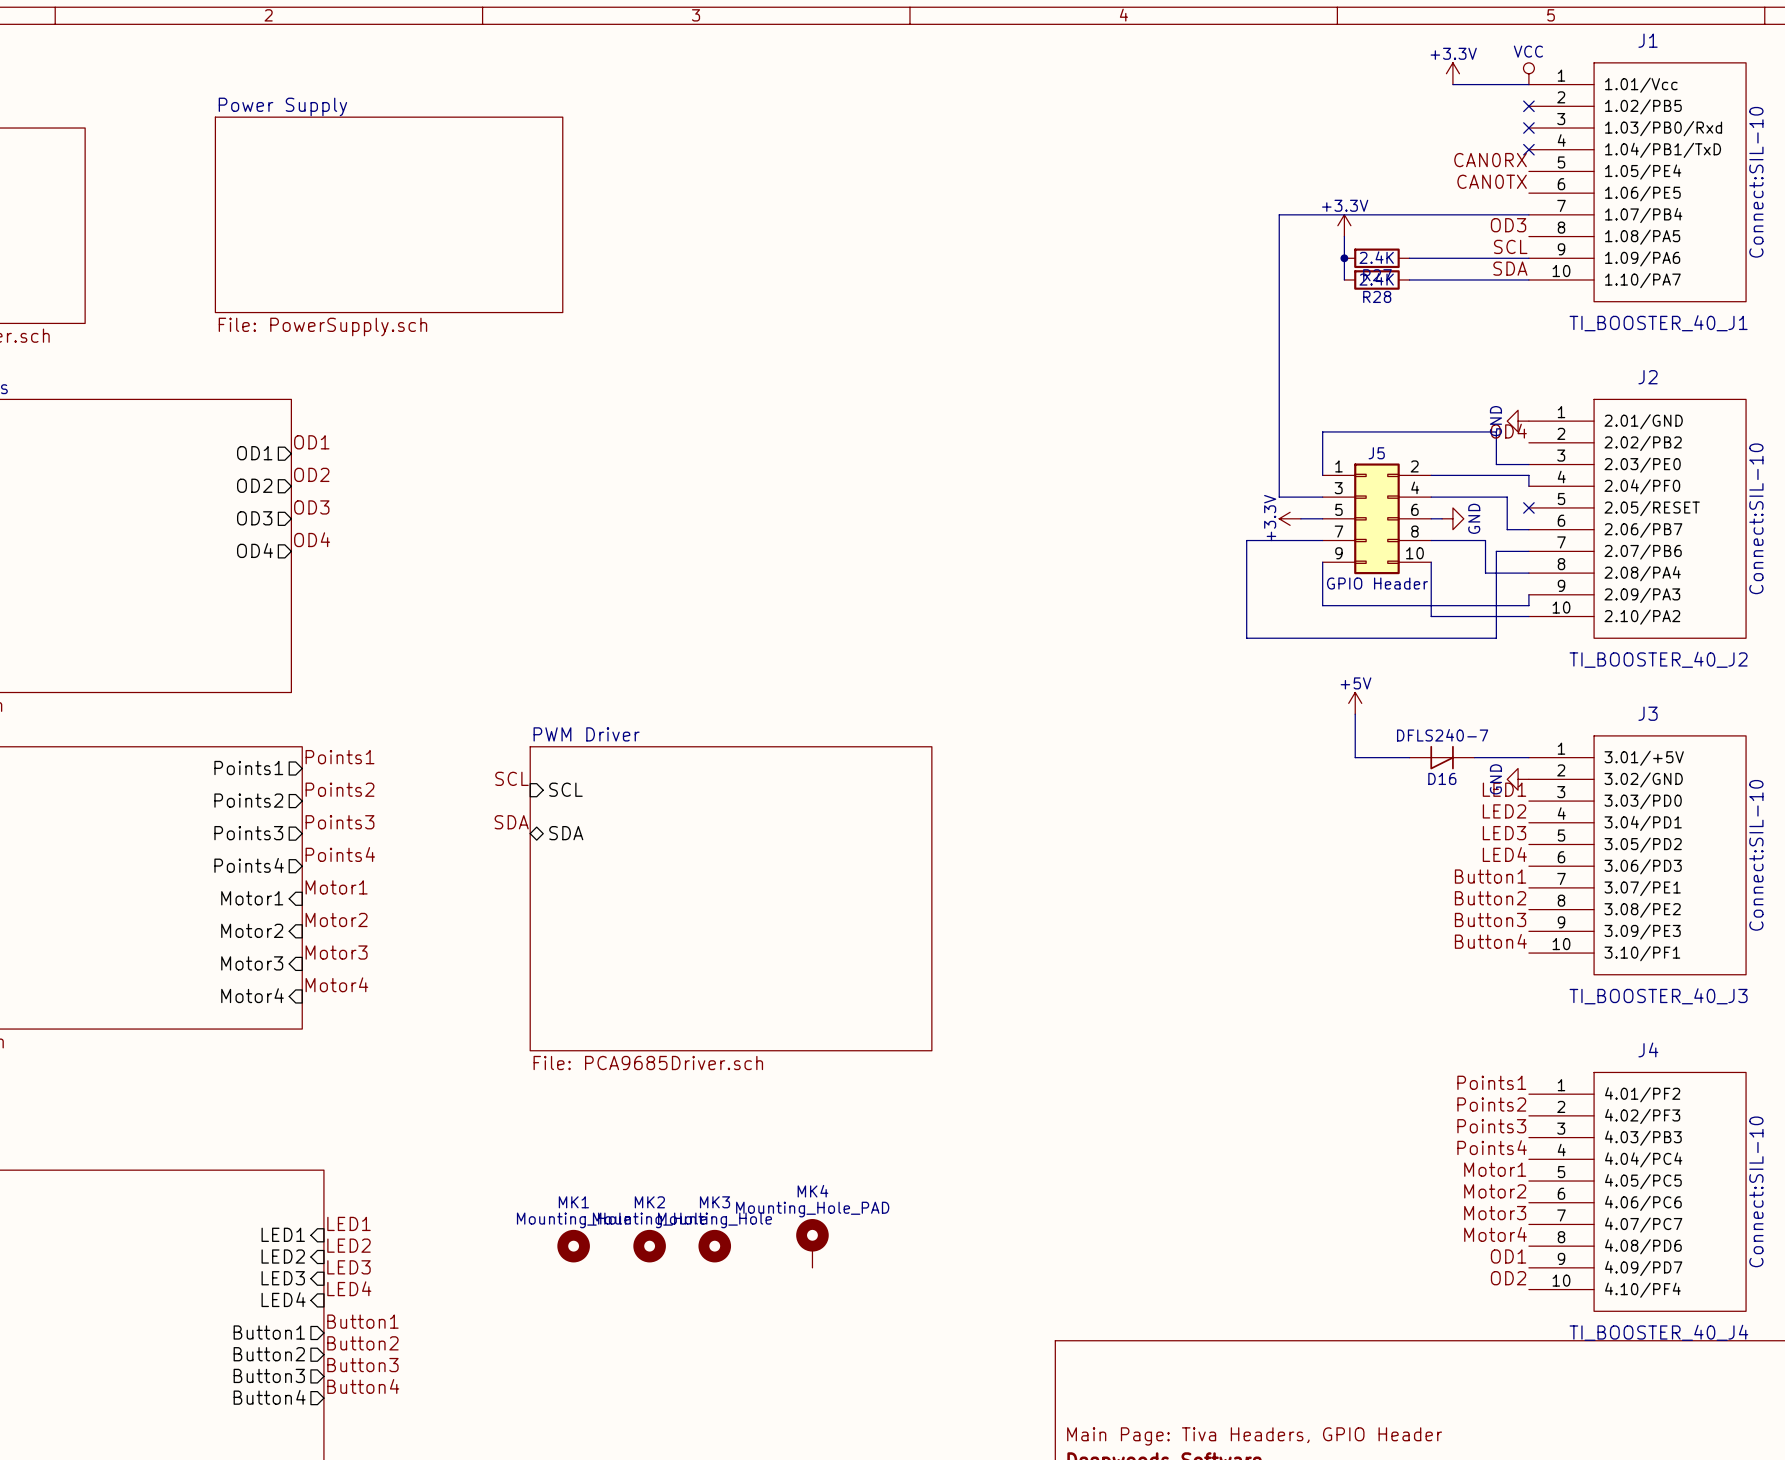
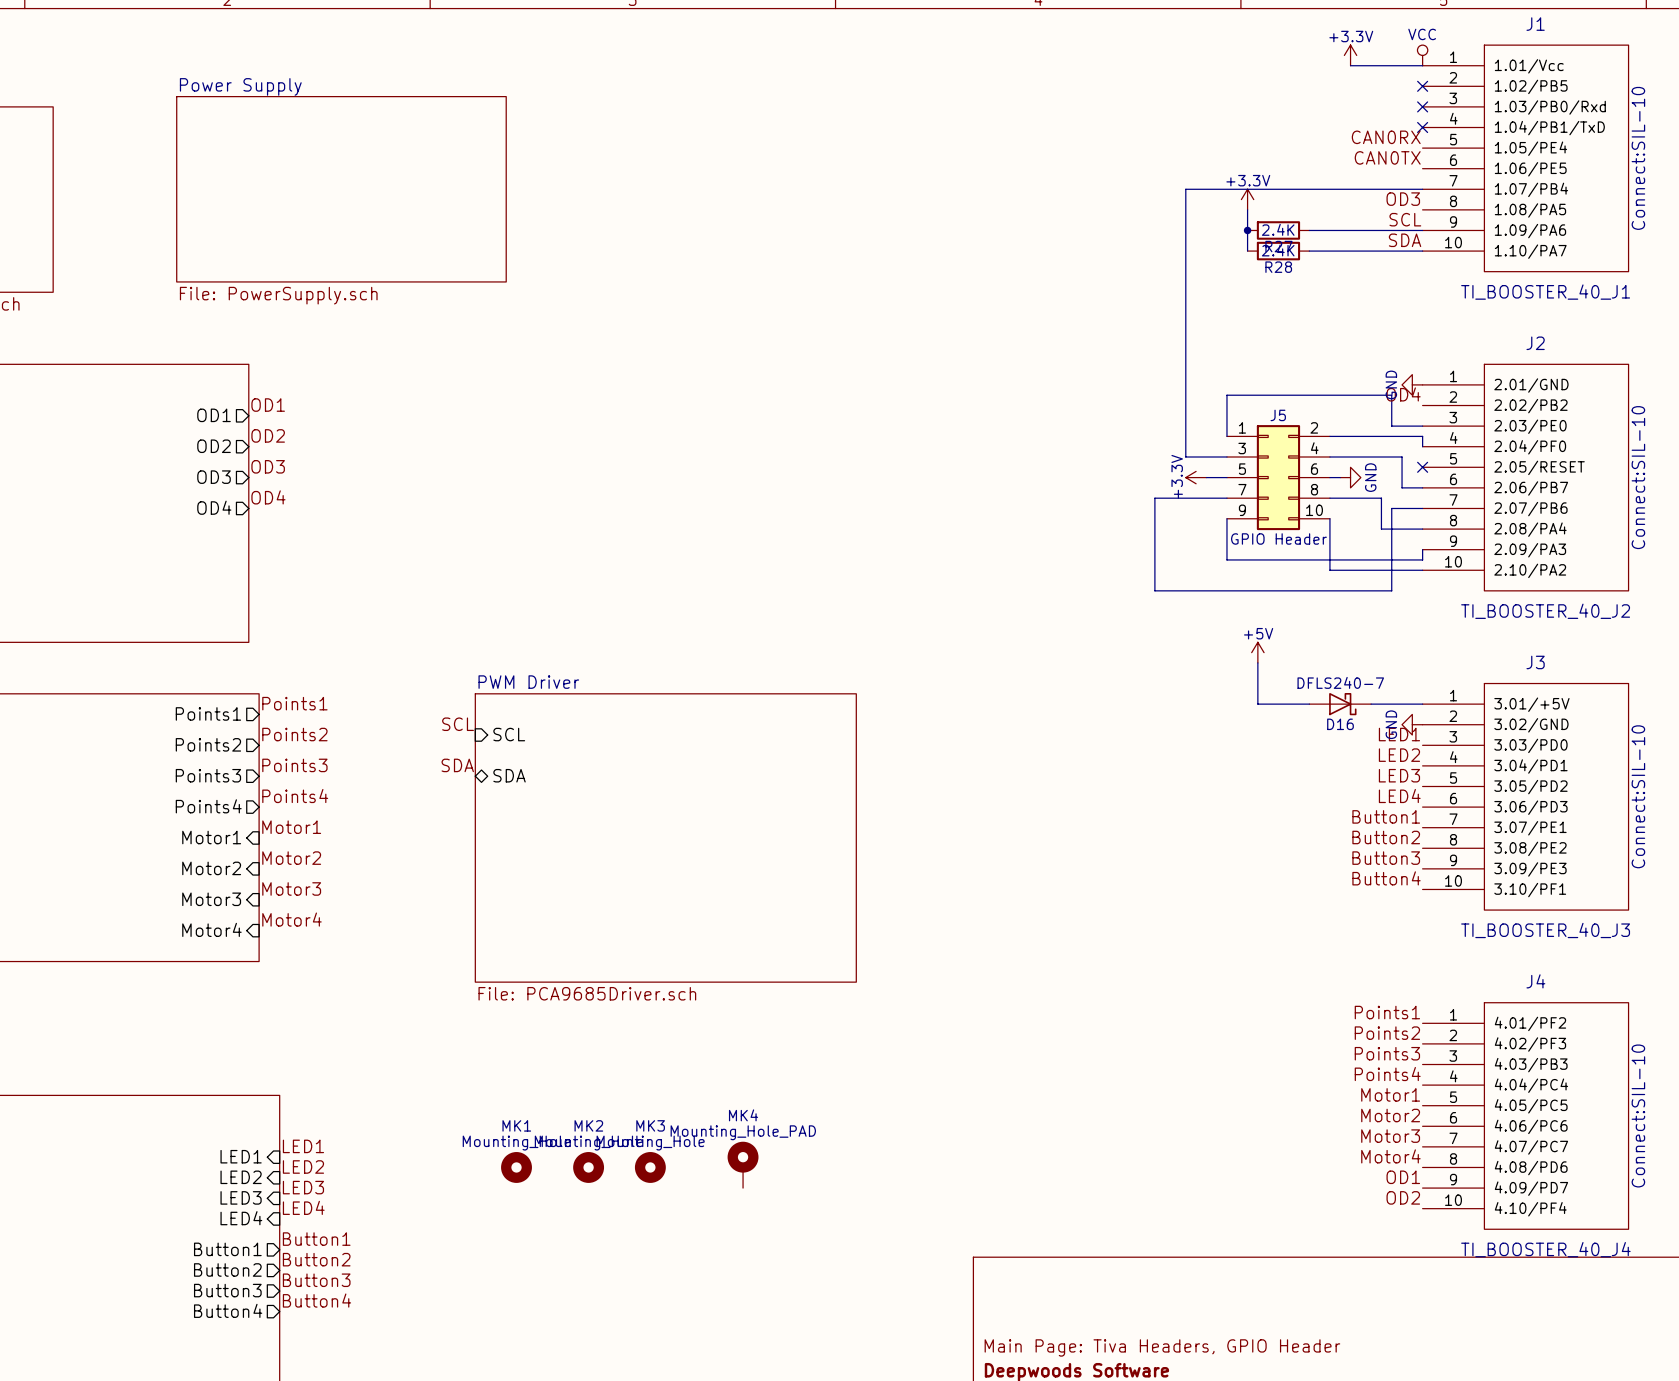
D16 symbol: [1409, 745, 1475, 770] -> [1309, 693, 1372, 716]

